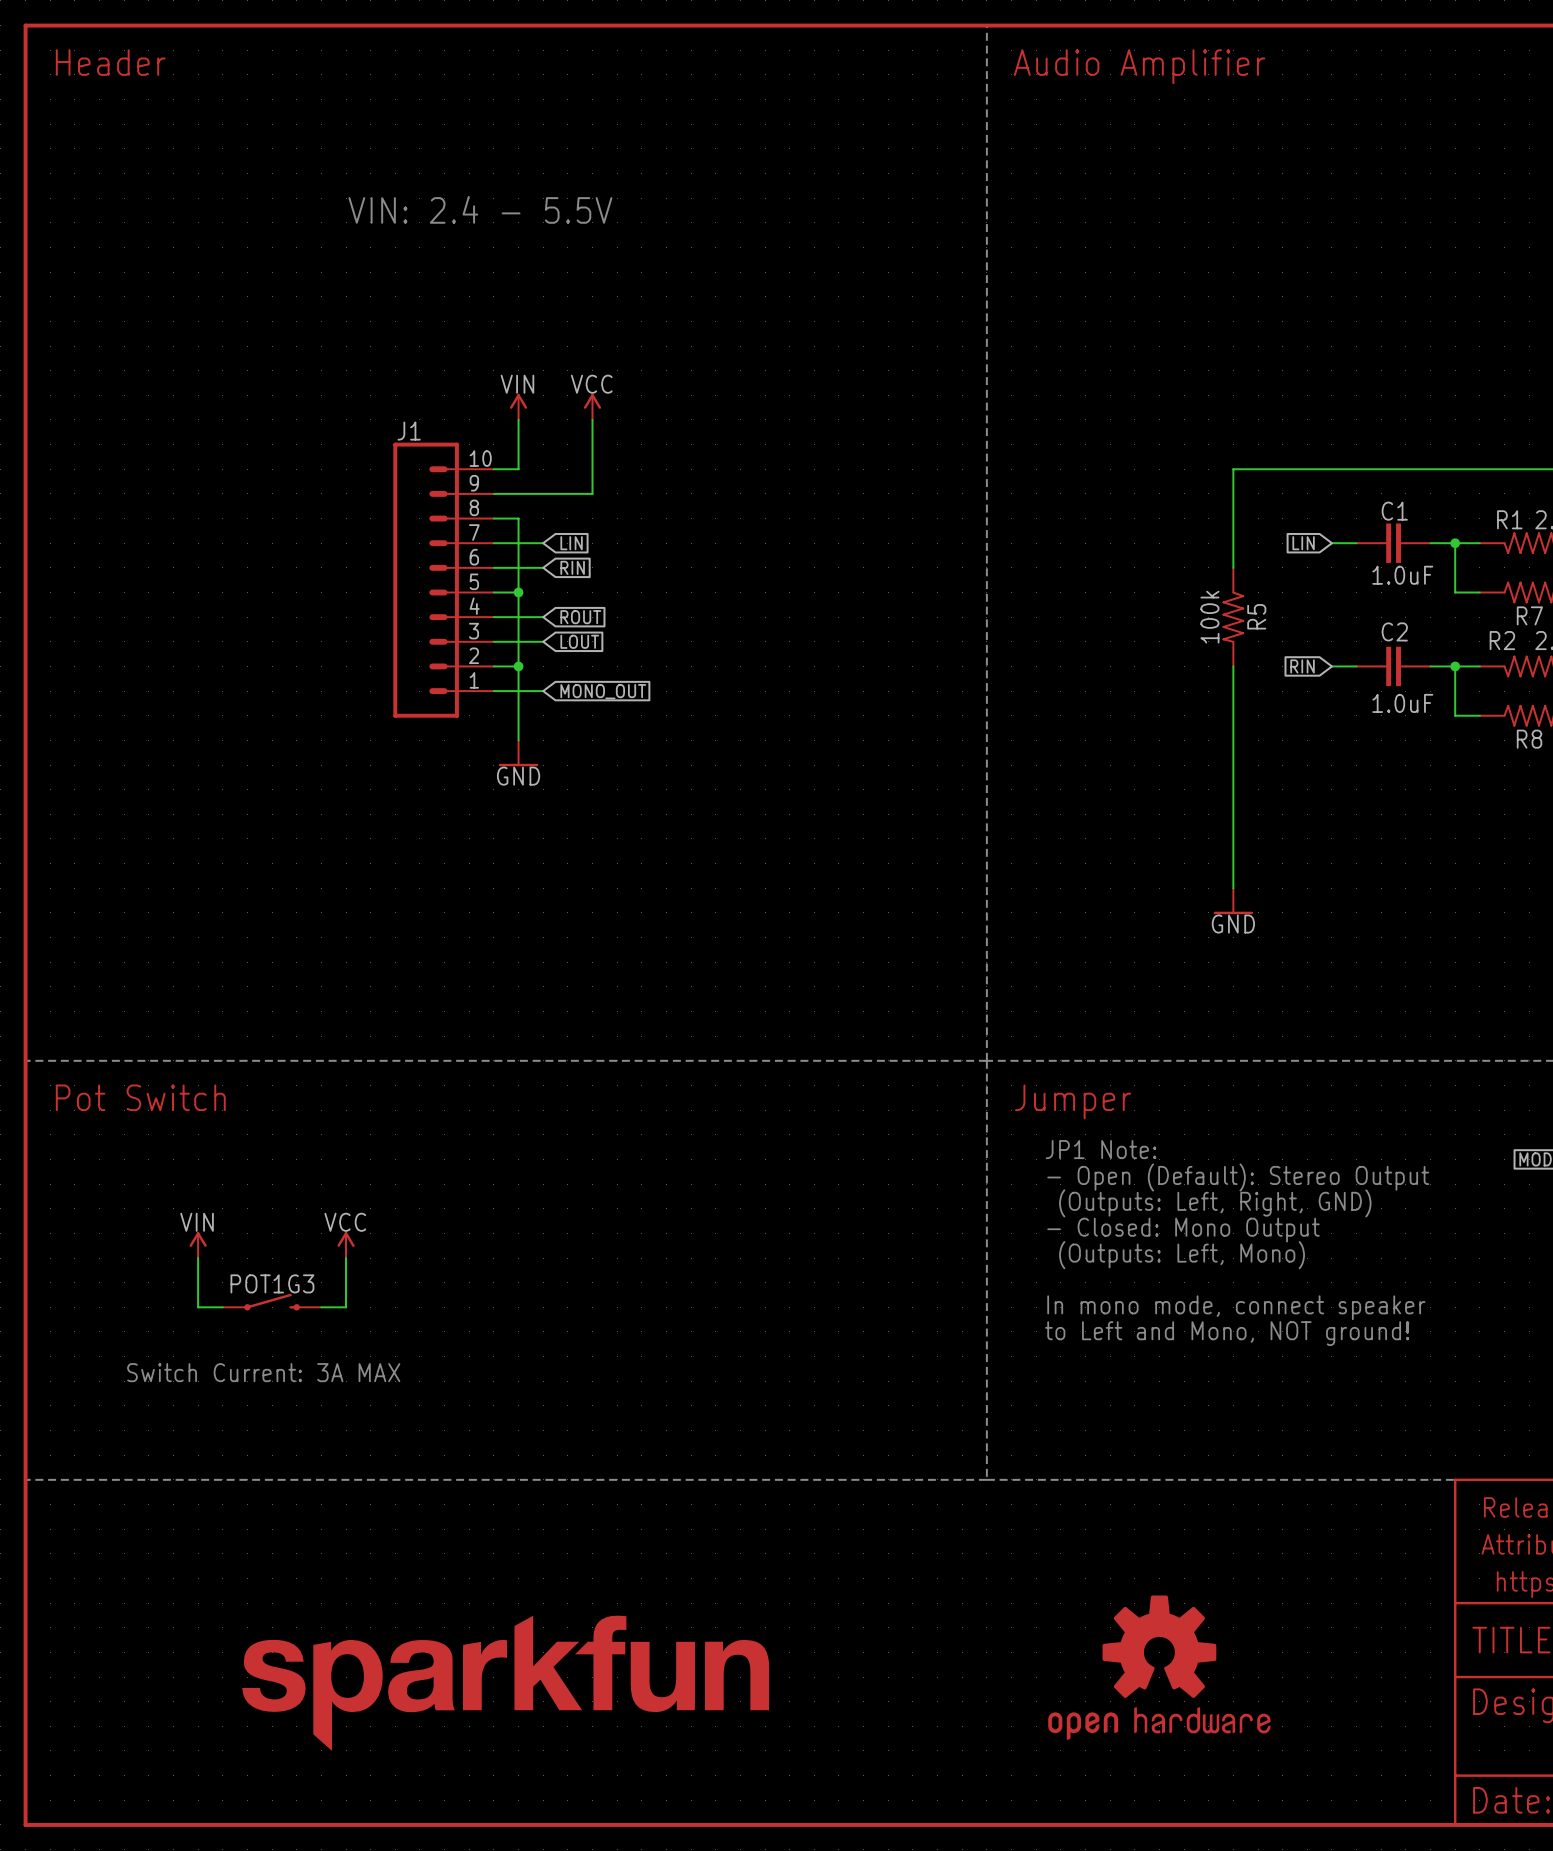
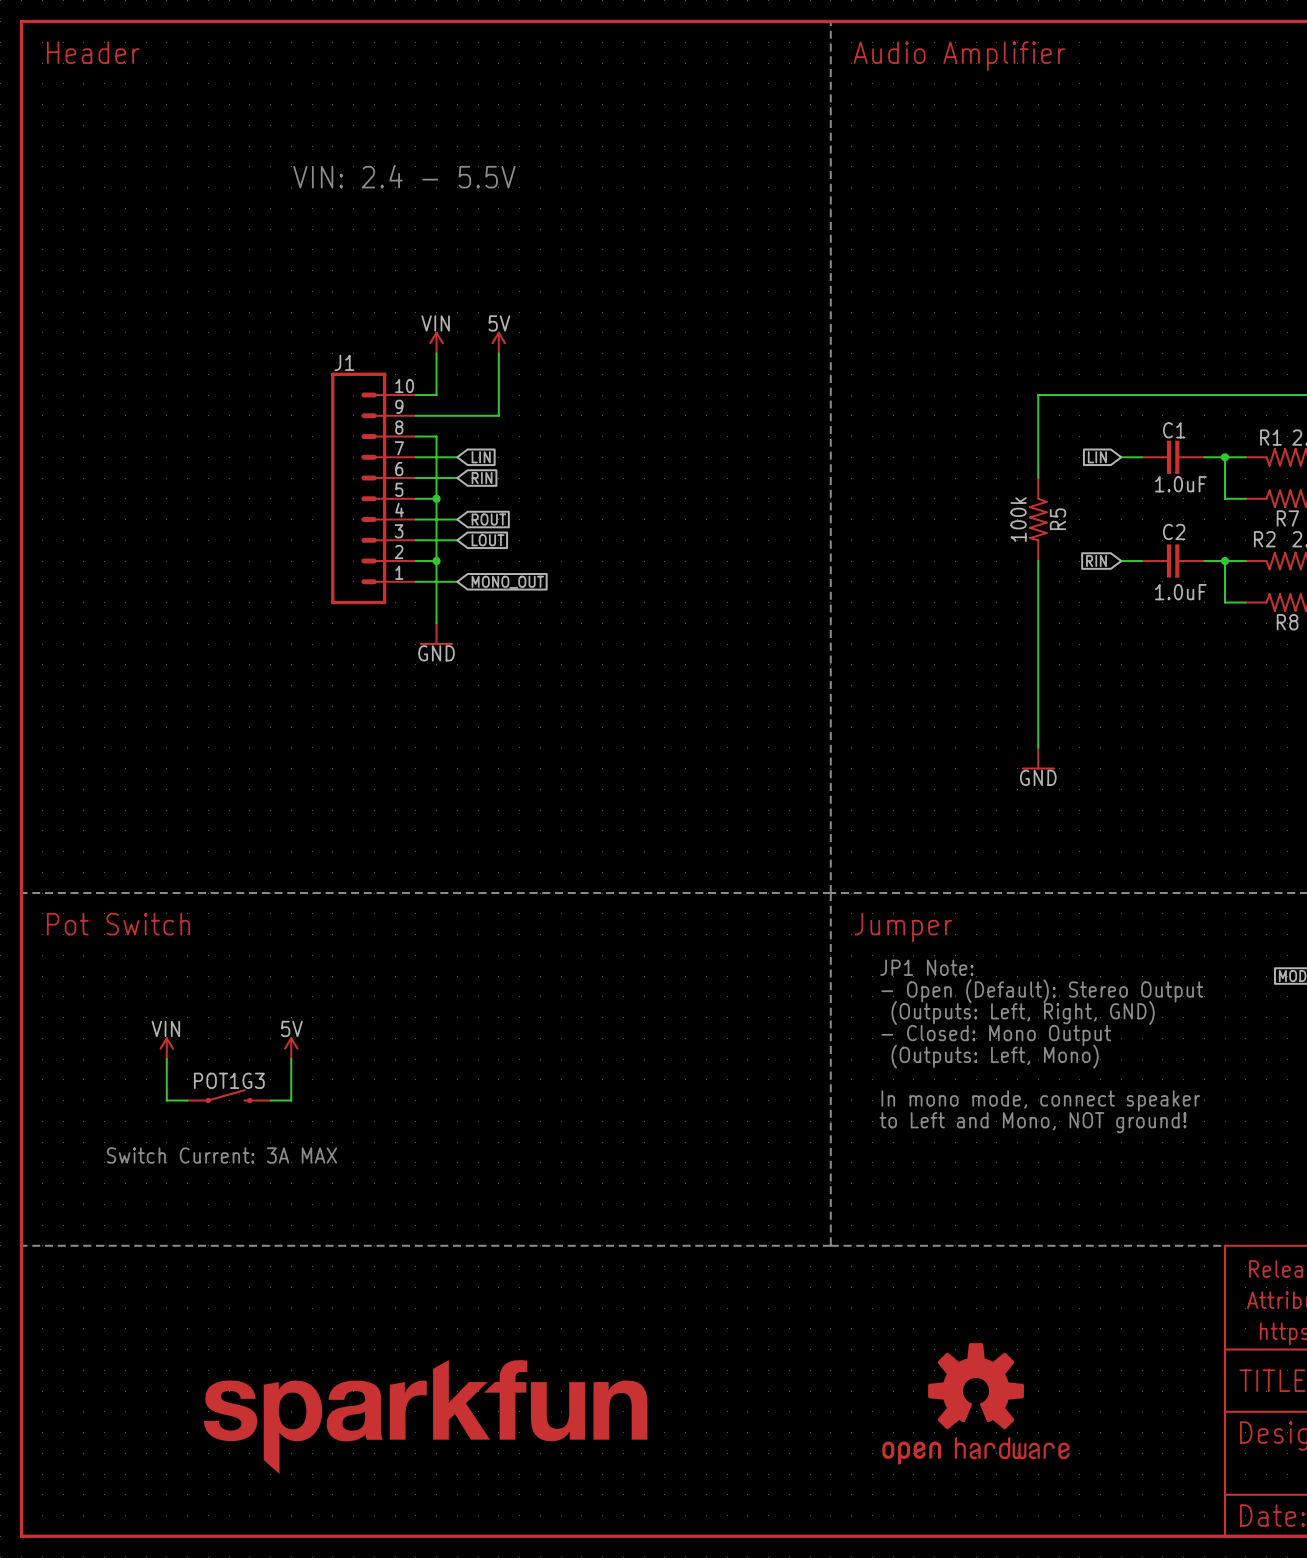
power symbol: VCC (592, 407) -> 5V (498, 342)
power symbol: VCC (346, 1245) -> 5V (291, 1048)

